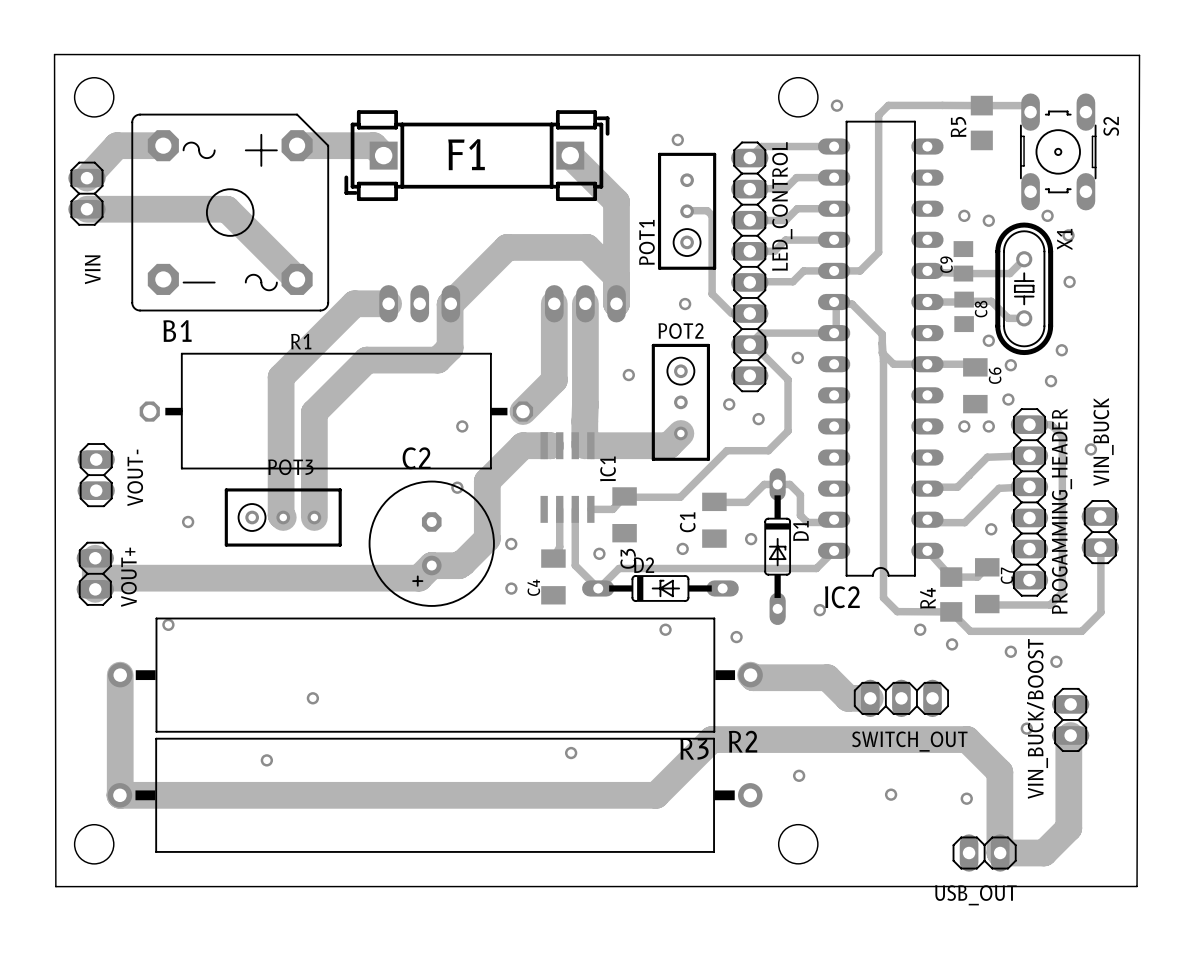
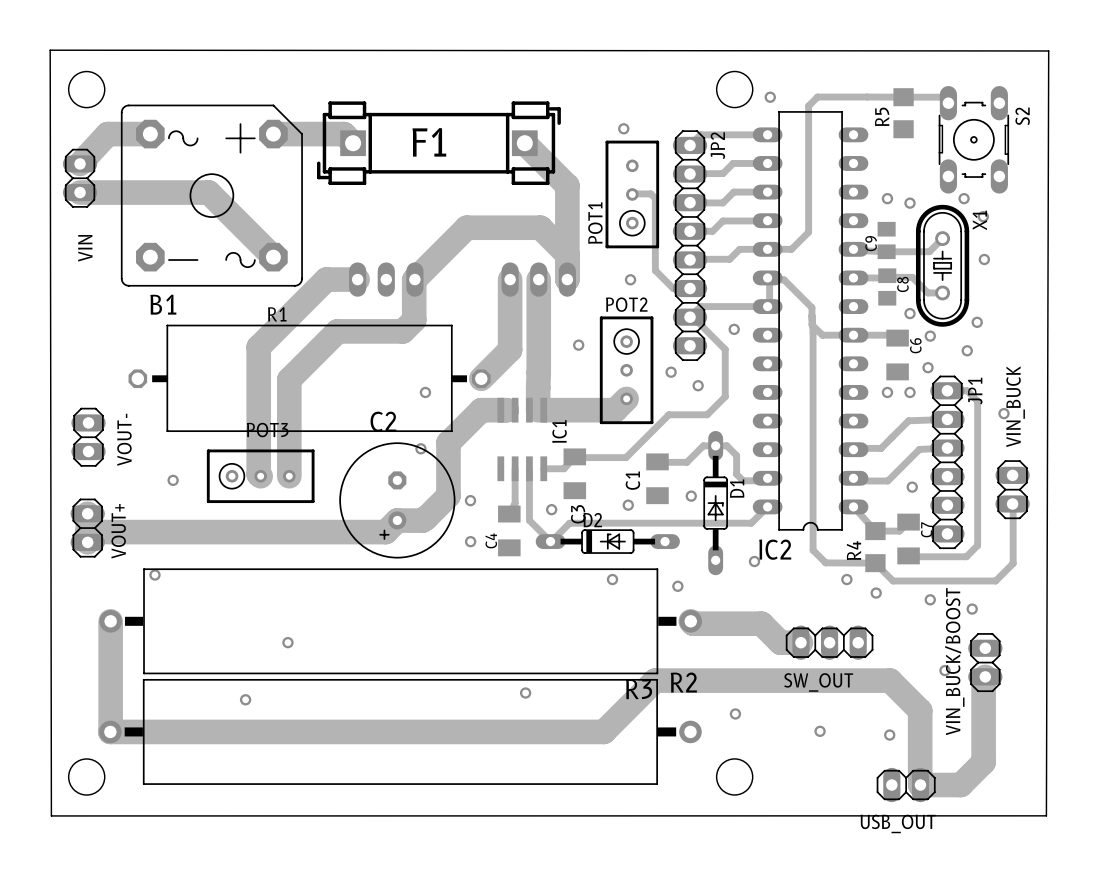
LED_CONTROL name: LED_CONTROL (782, 206) -> JP2 (717, 145)
PROGAMMING_HEADER name: PROGAMMING_HEADER (1061, 511) -> JP1 (975, 391)
SWITCH_OUT name: SWITCH_OUT (909, 741) -> SW_OUT (818, 682)

